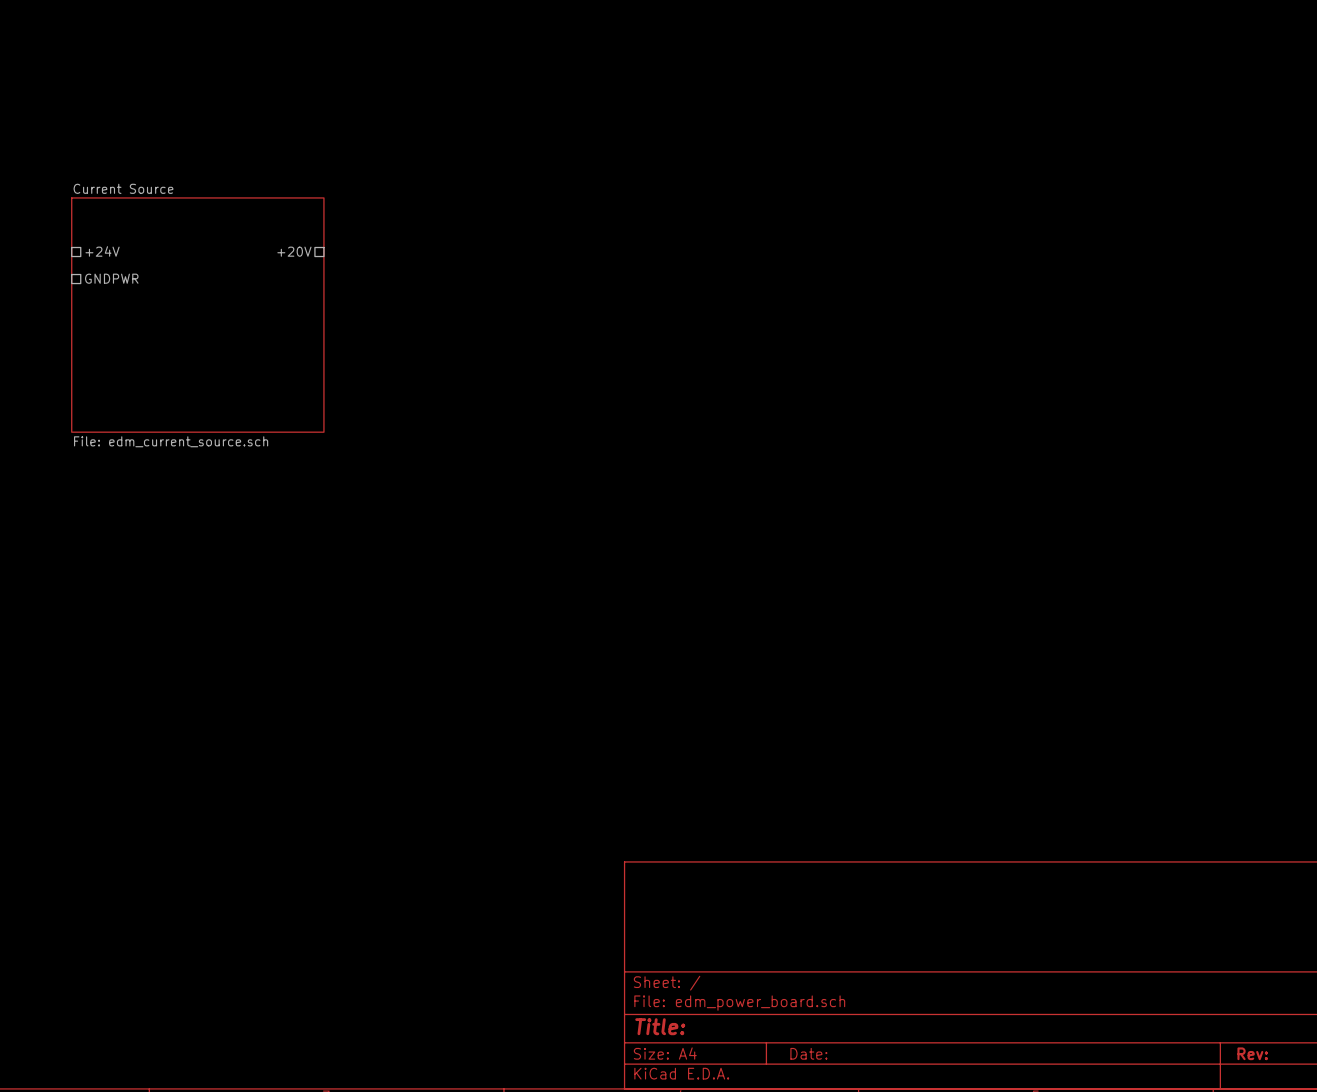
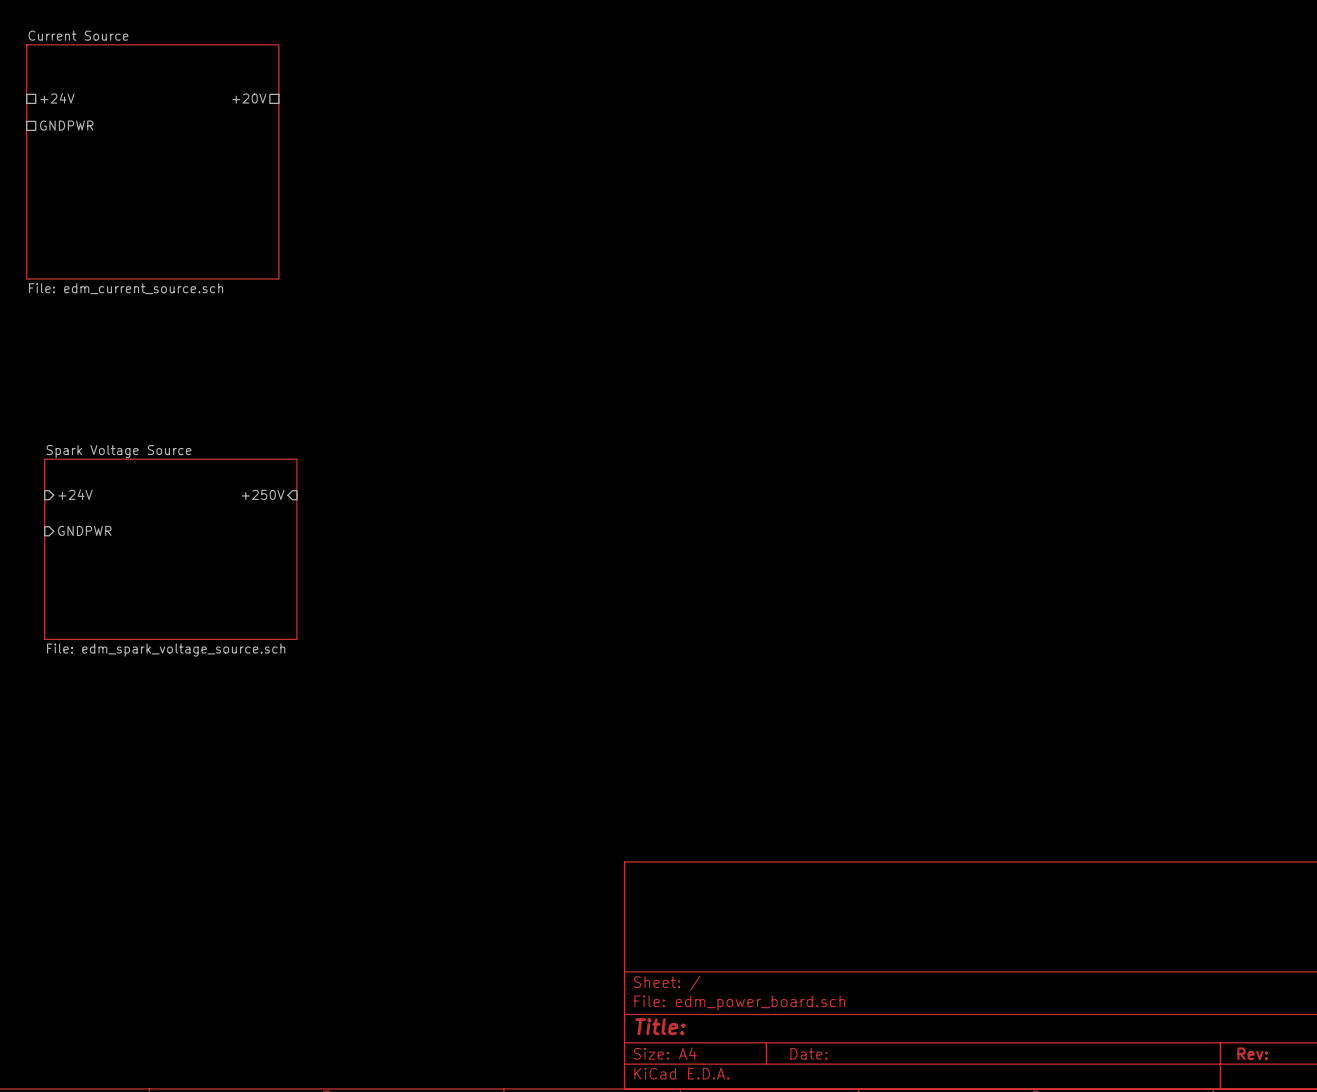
sheet pin: none -> +24V (57, 98)
sheet pin: none -> GNDPWR (66, 125)
sheet pin: +24V (102, 251) -> none
sheet pin position: +20V (294, 251) -> +20V (249, 98)
sheet pin: GNDPWR (111, 278) -> none
sheet Current Source position: (197, 315) -> (152, 161)
sheet pin: none -> +24V (75, 494)
sheet pin: none -> +250V (263, 494)
sheet pin: none -> GNDPWR (84, 530)
sheet Spark Voltage Source: none -> File: edm_spark_voltage_source.sch (170, 549)

